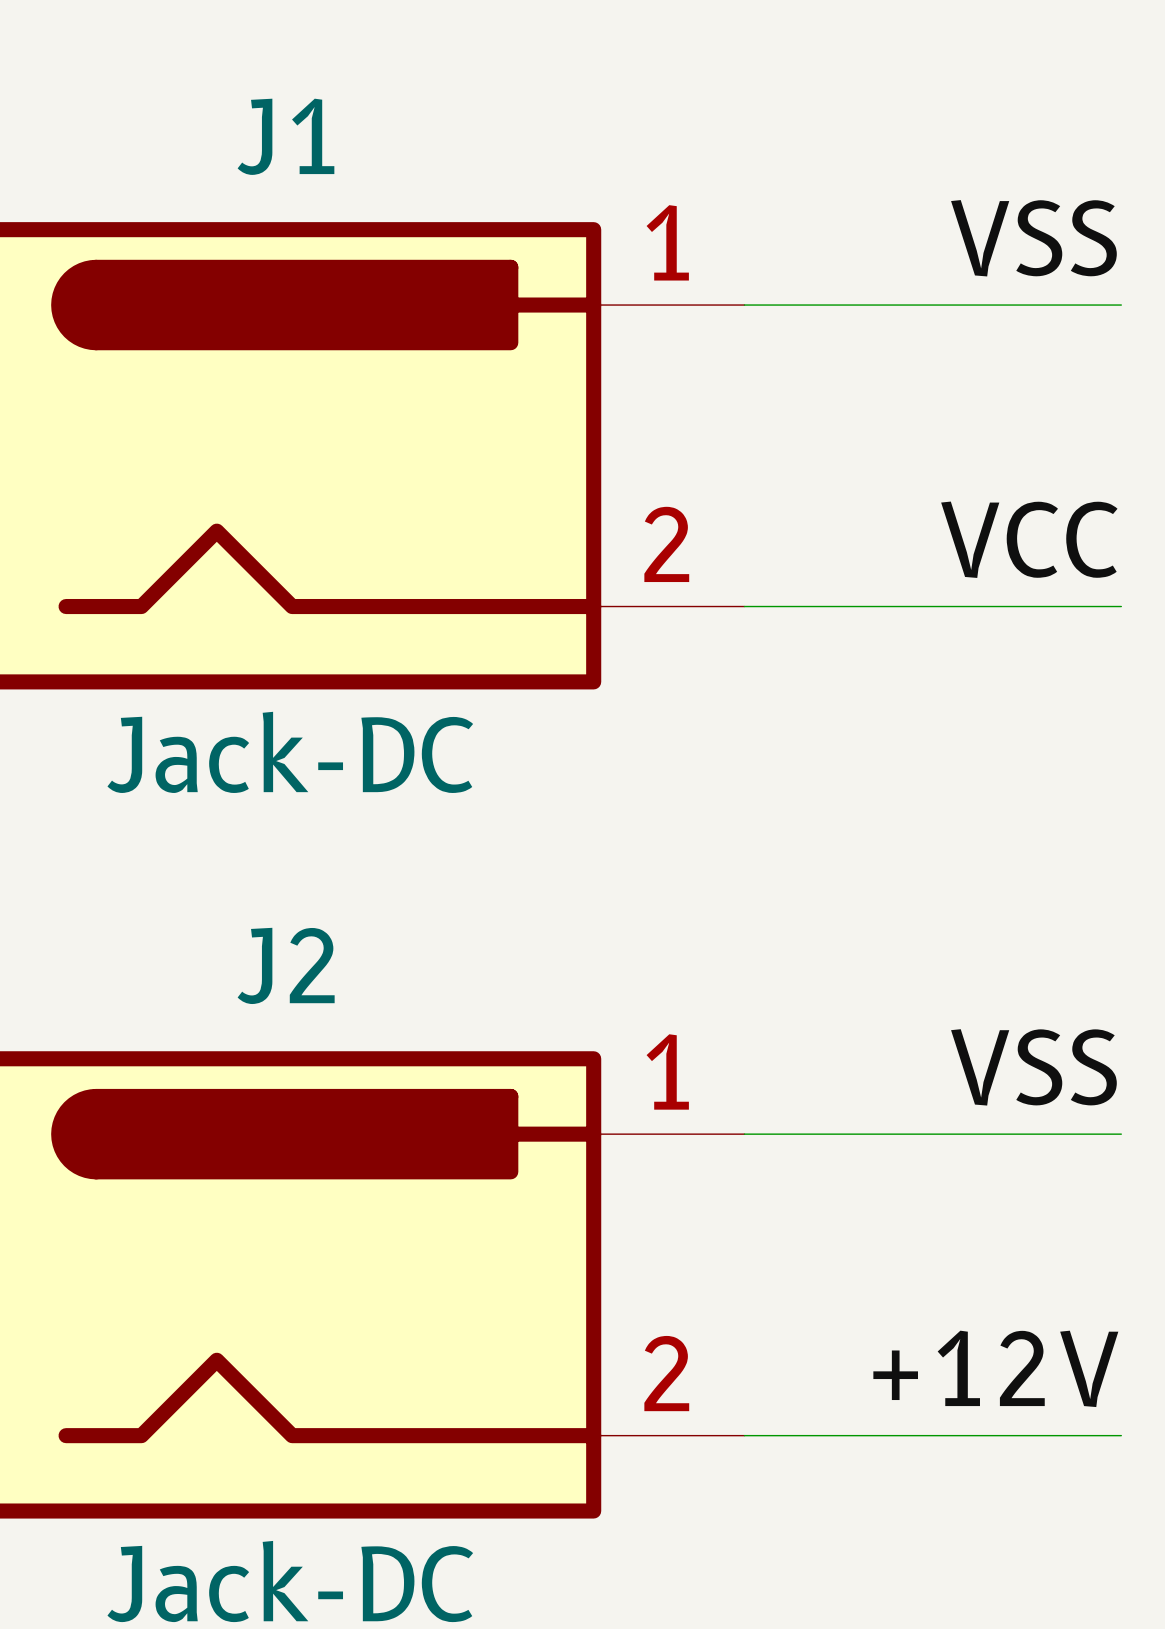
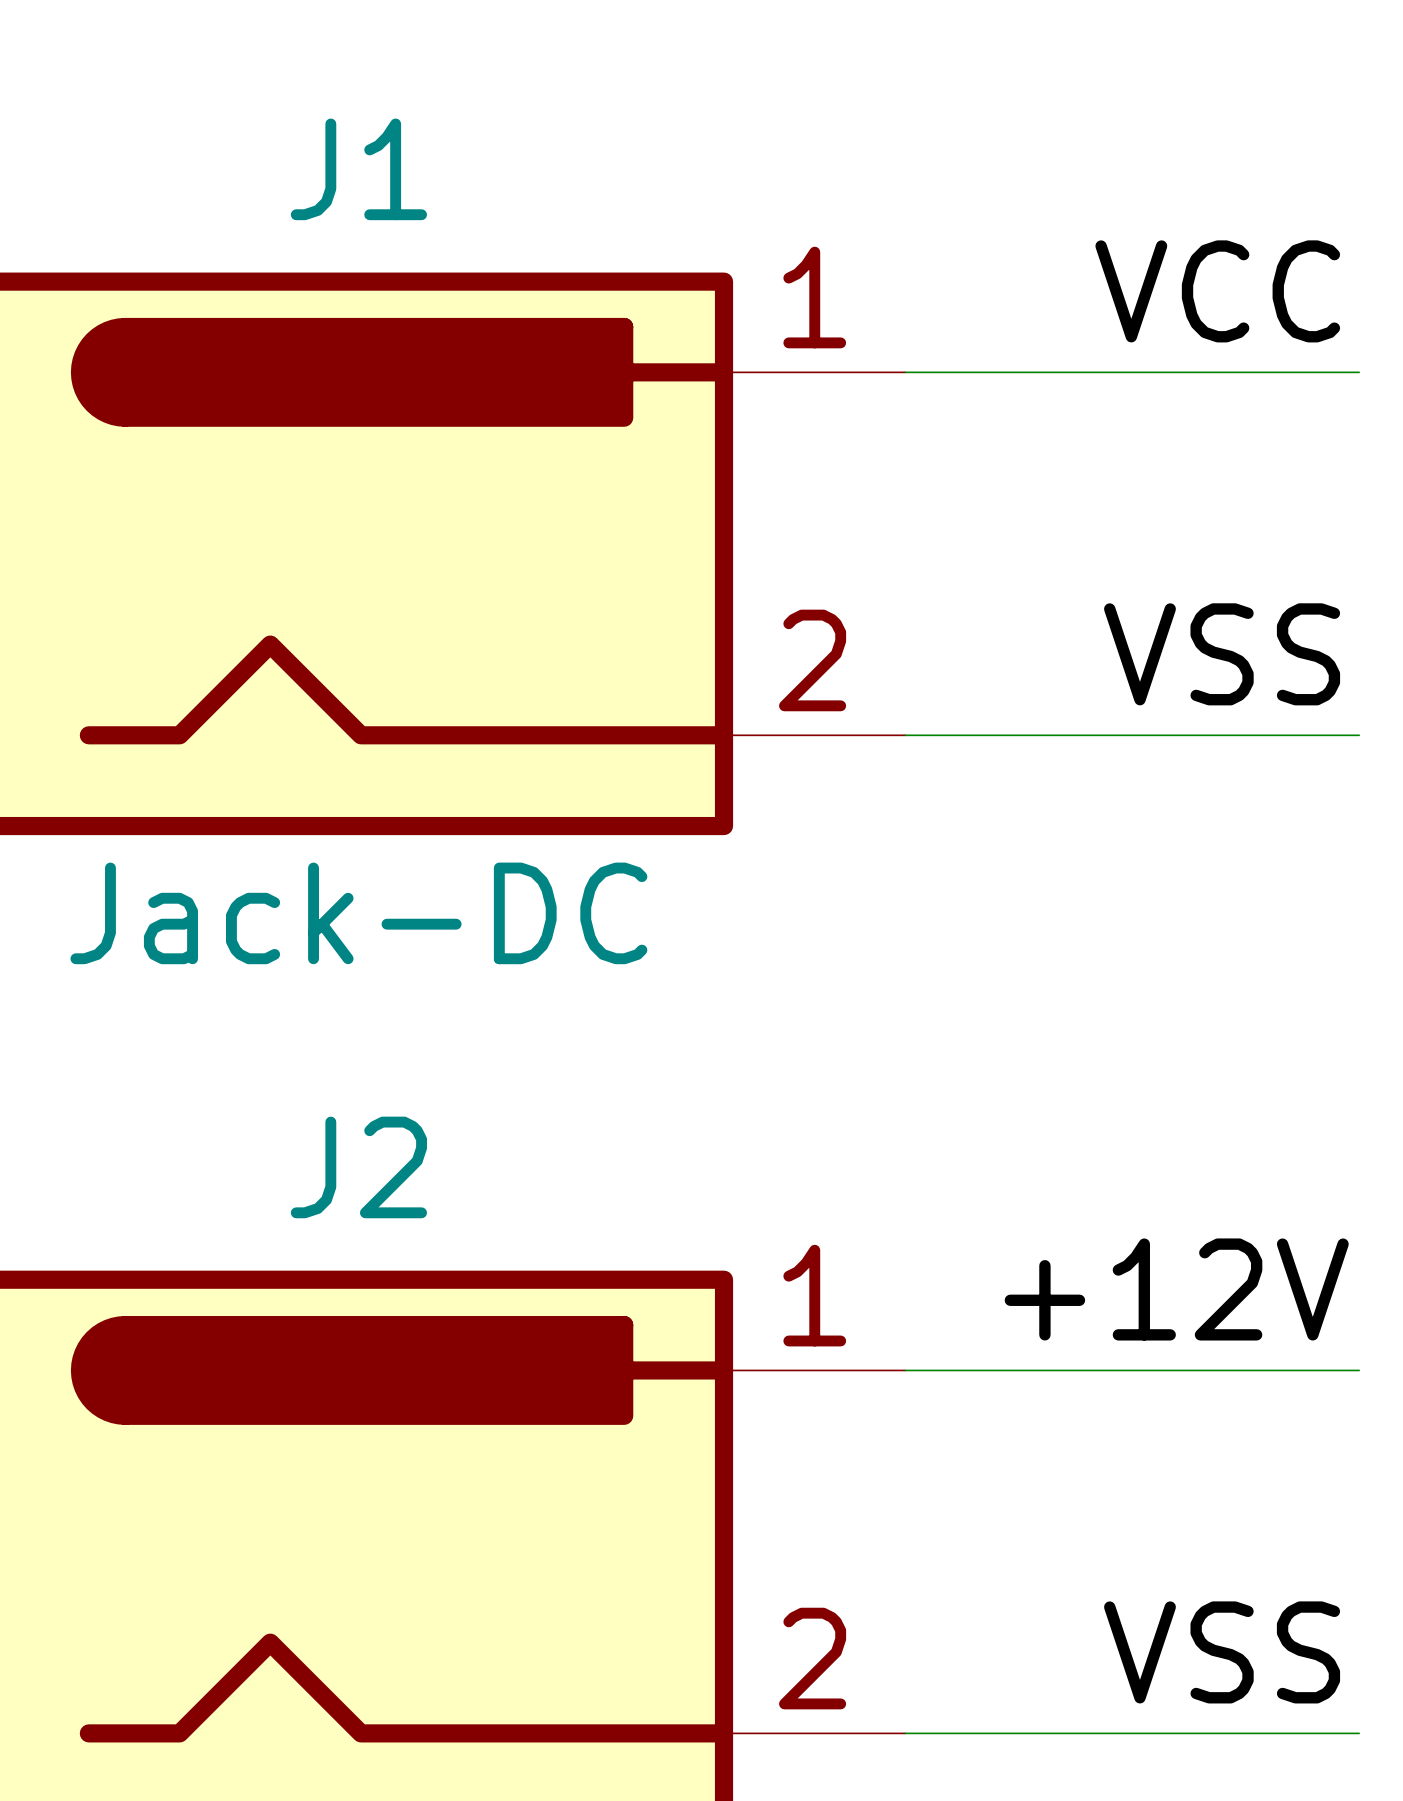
label: VSS (1033, 238) -> VCC (1217, 291)
label: VCC (1029, 539) -> VSS (1222, 654)
label: VSS (1033, 1067) -> +12V (1176, 1289)
label: +12V (995, 1368) -> VSS (1222, 1652)

